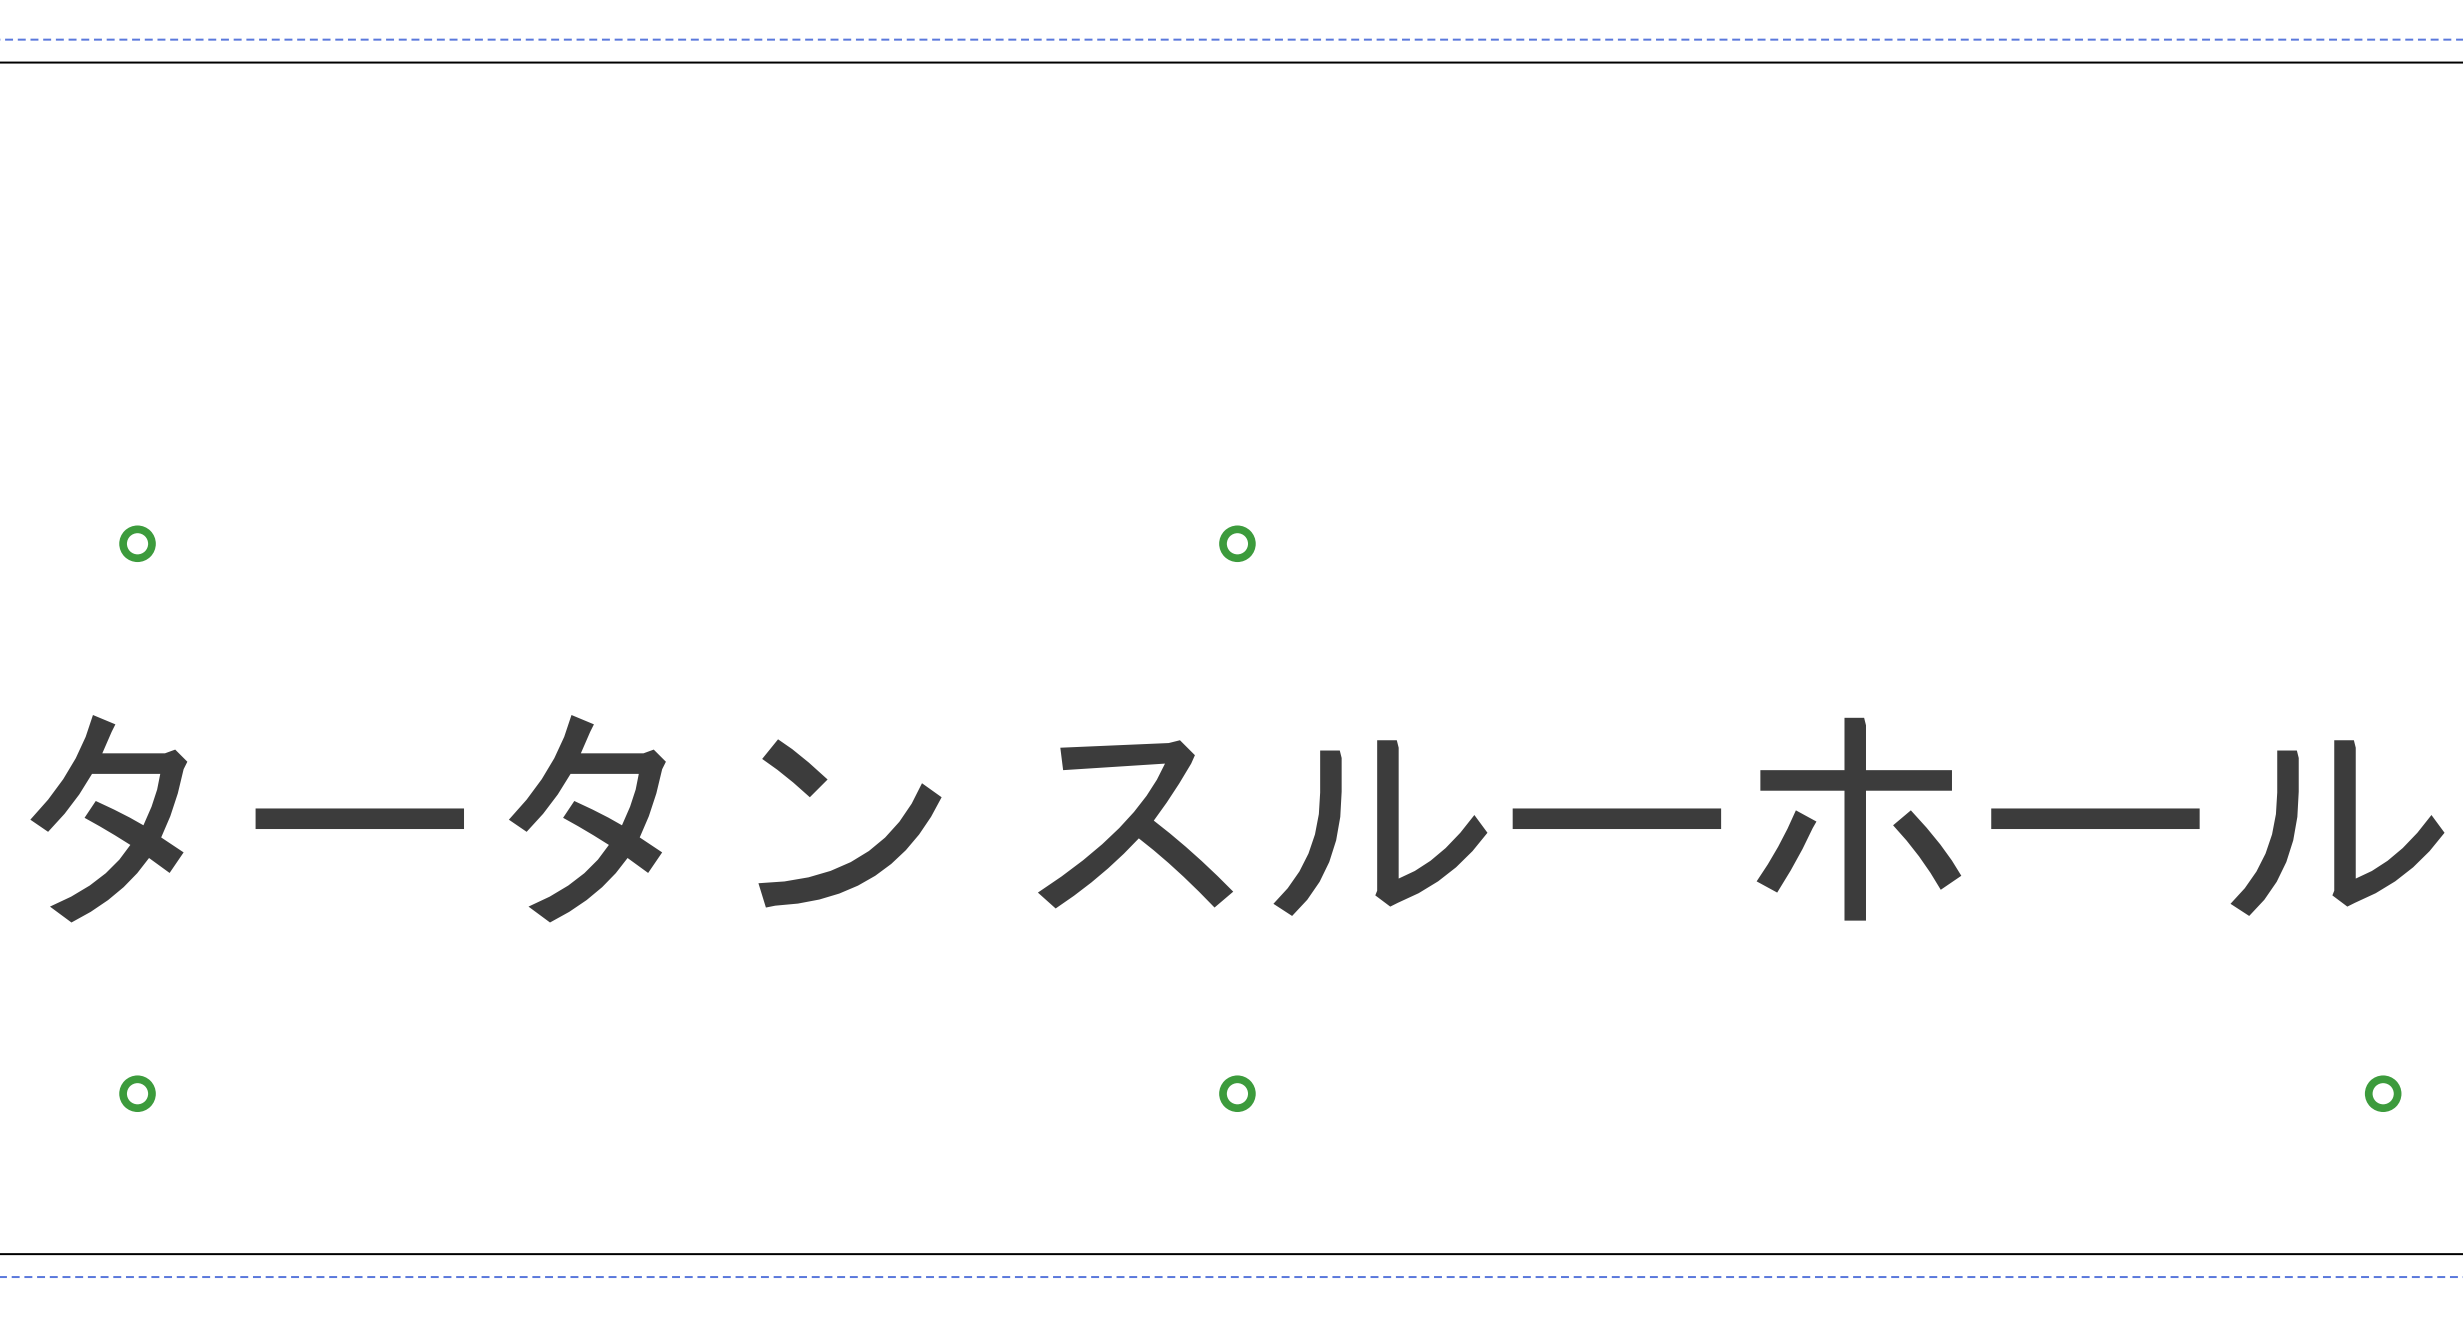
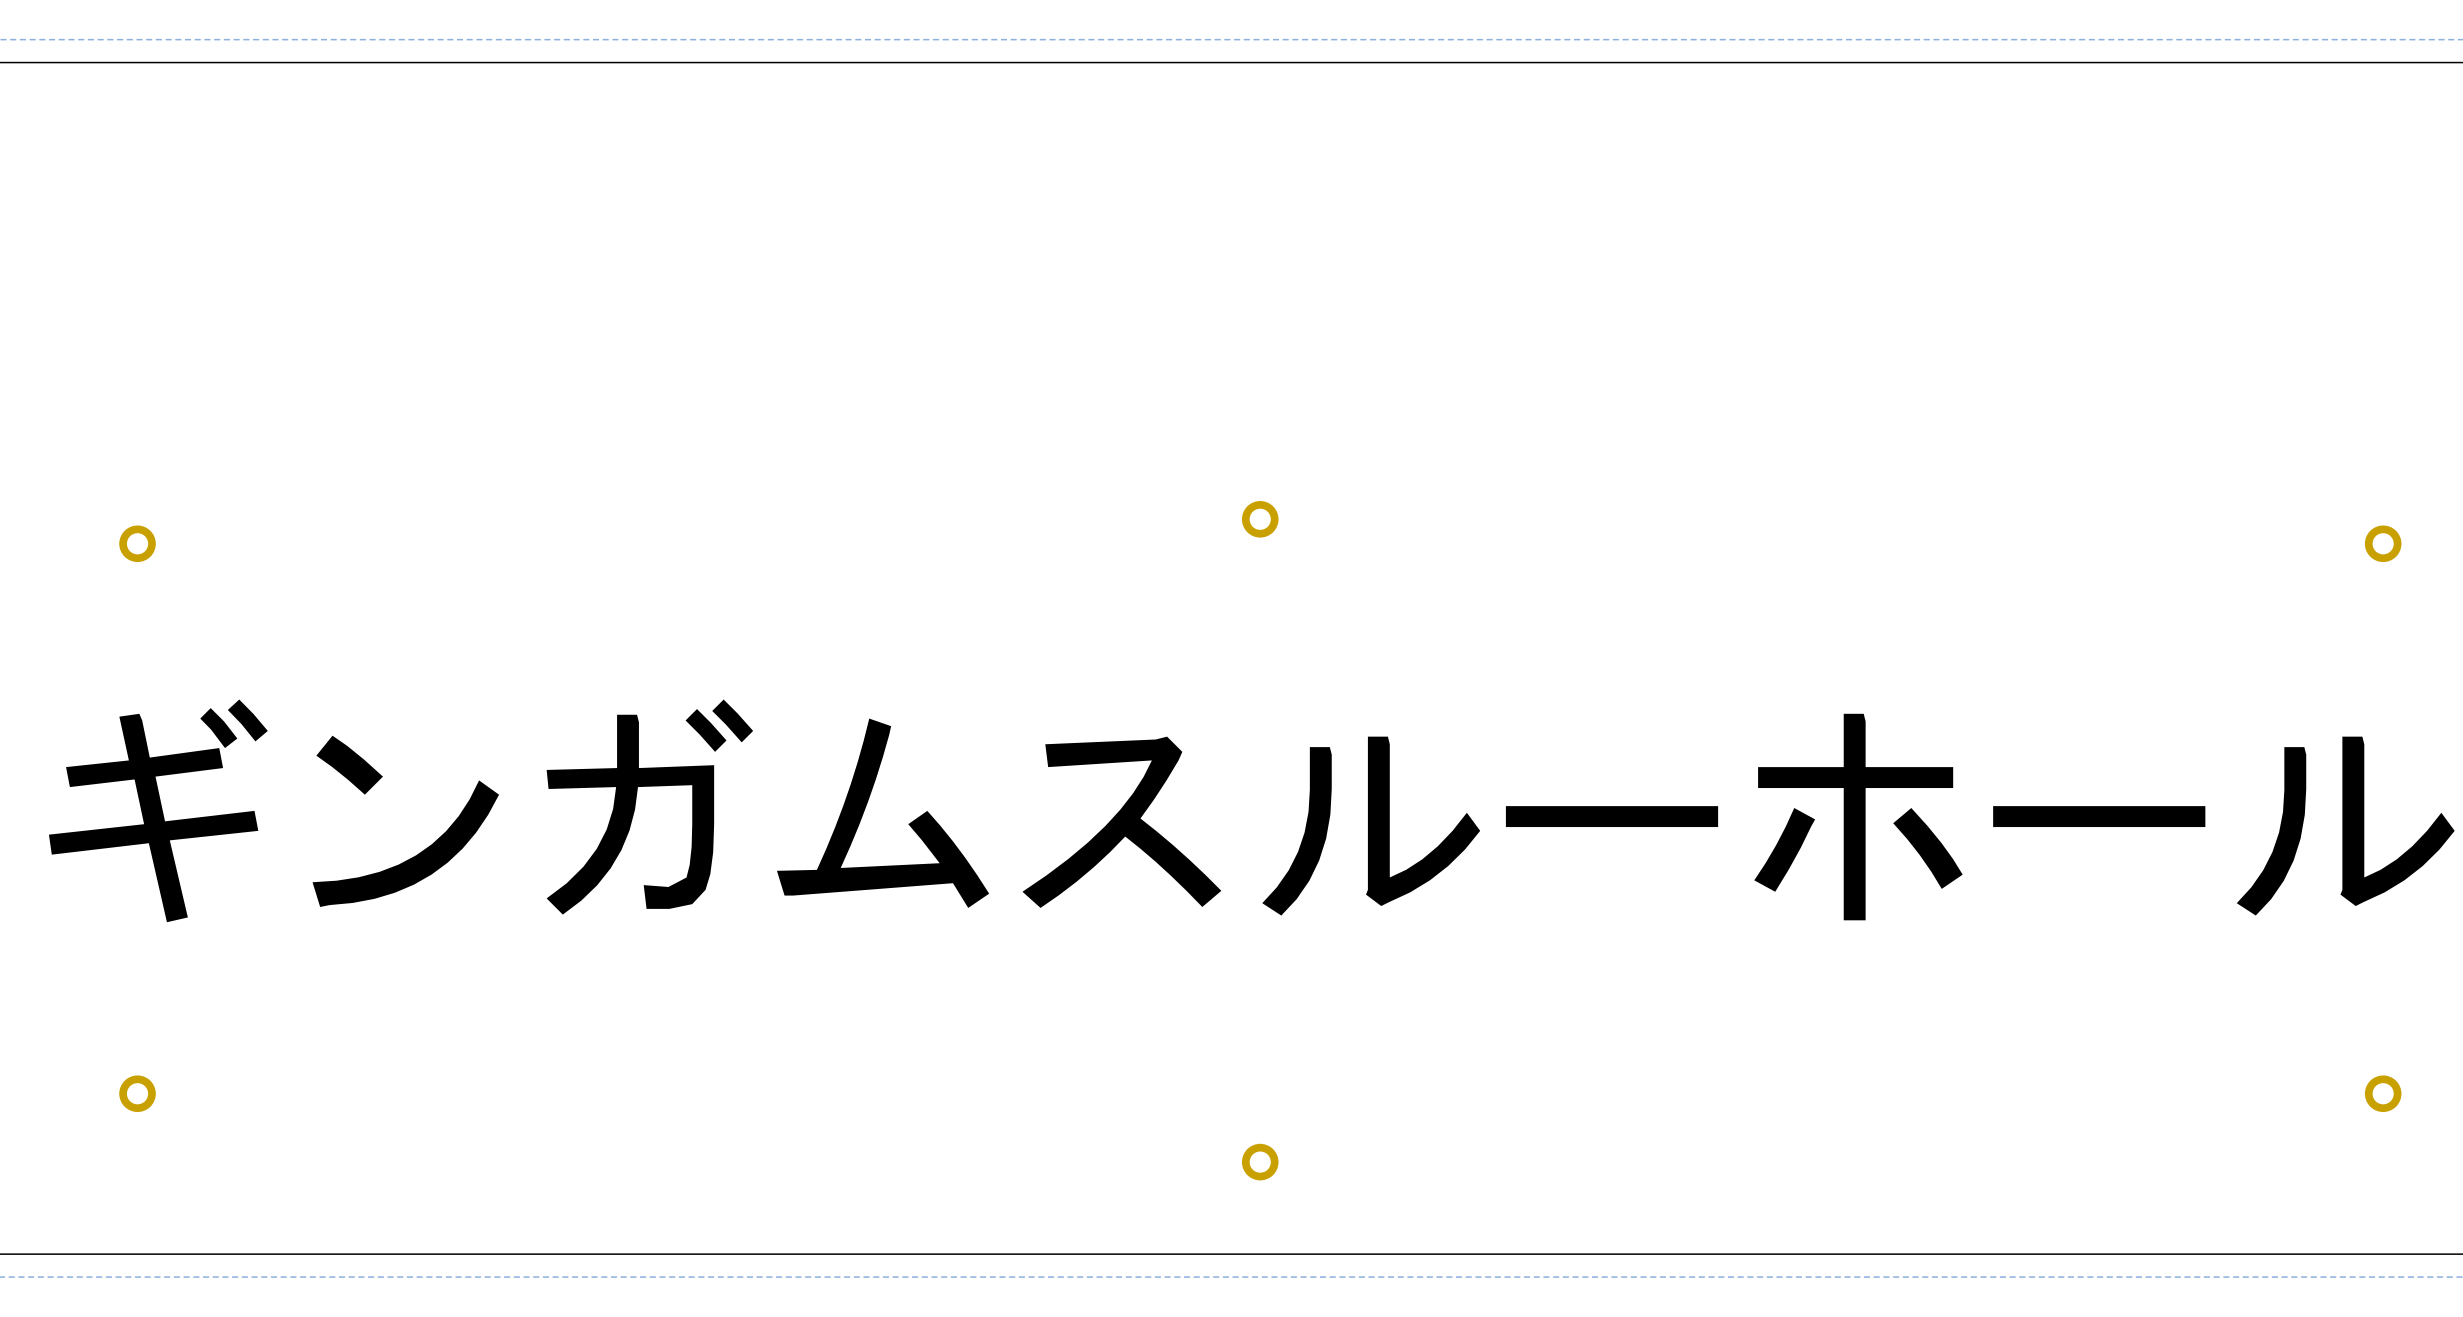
part position: (1237, 543) -> (1260, 519)
part: none -> (2383, 543)
drawing: none -> [48, 699, 2455, 923]
drawing: [30, 715, 2445, 923] -> none
part position: (1237, 1093) -> (1260, 1162)

